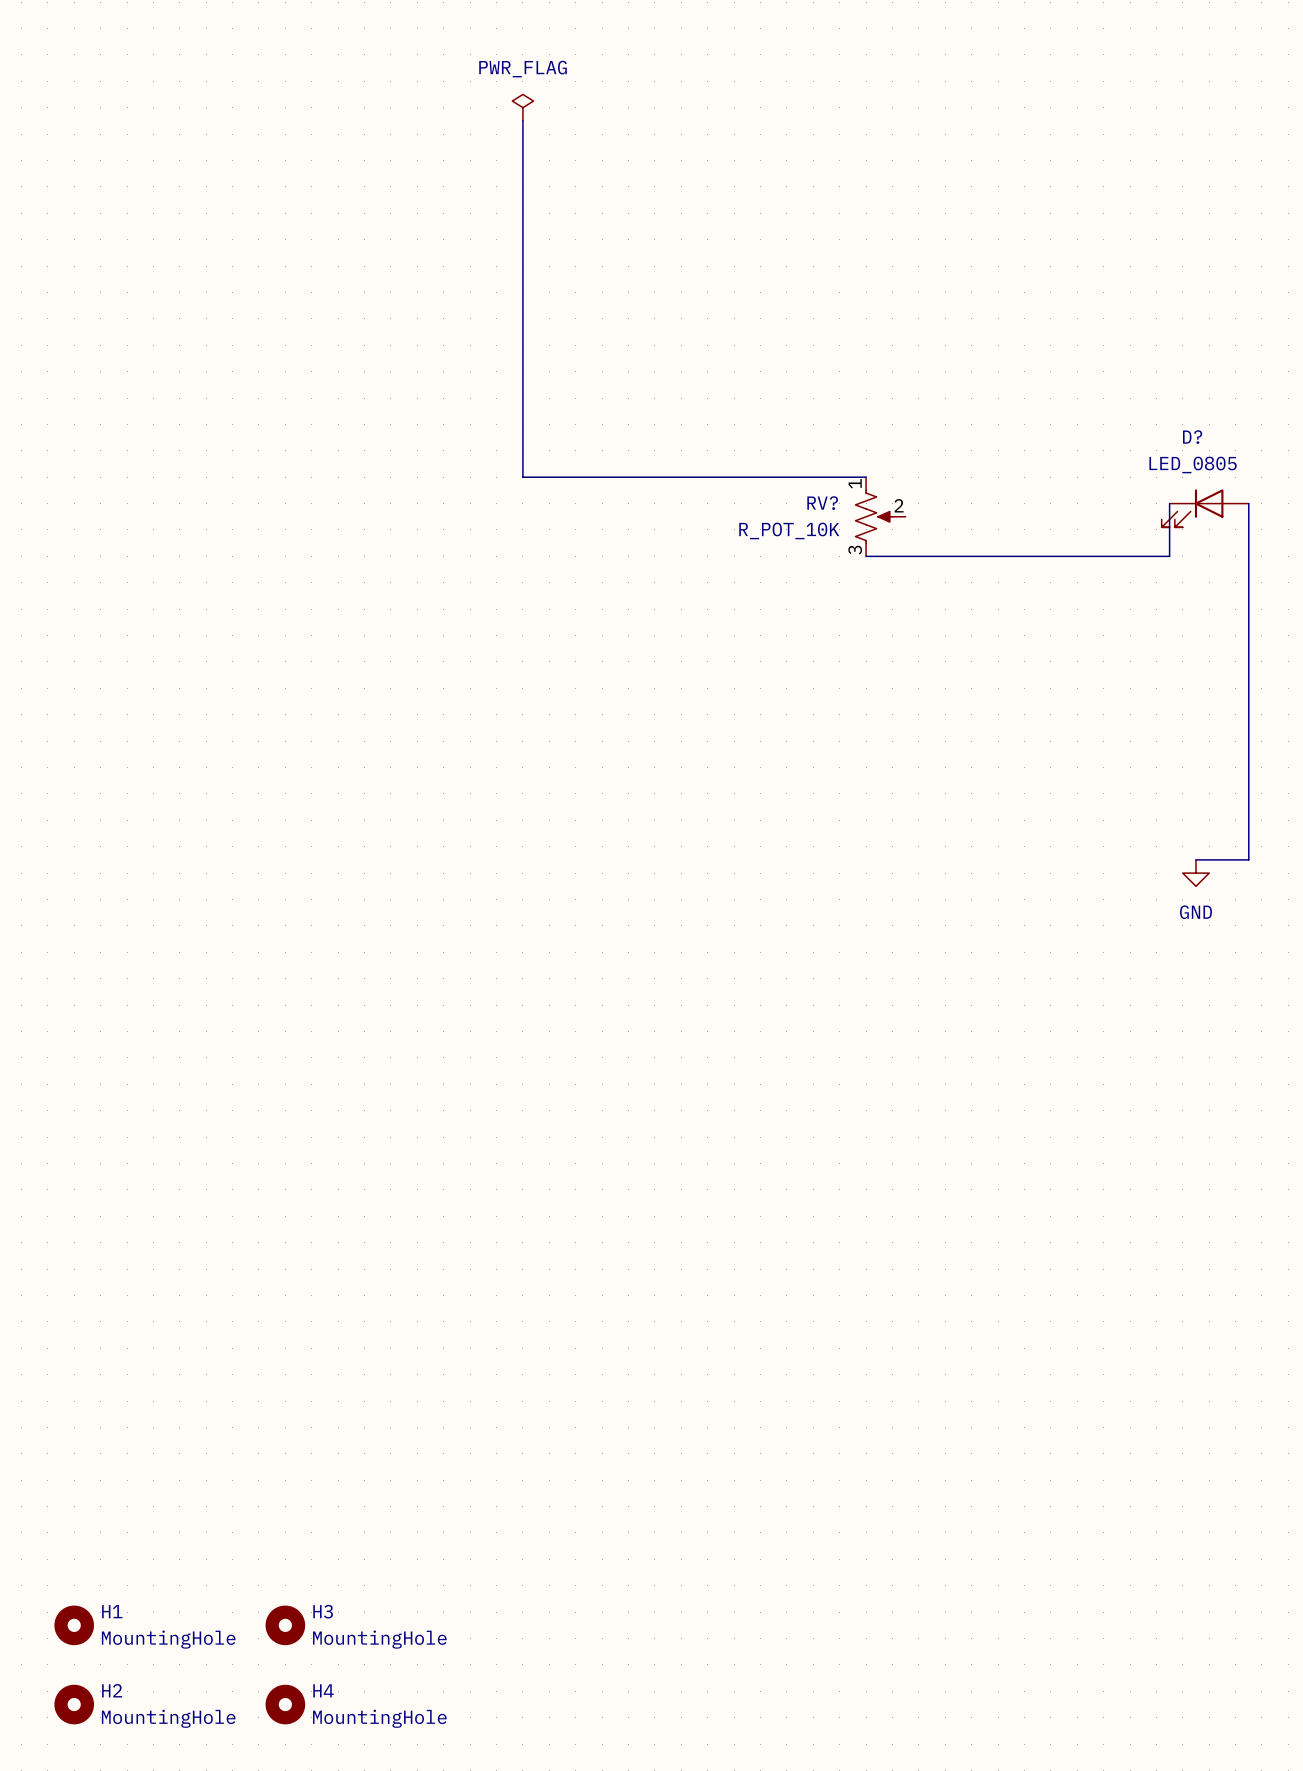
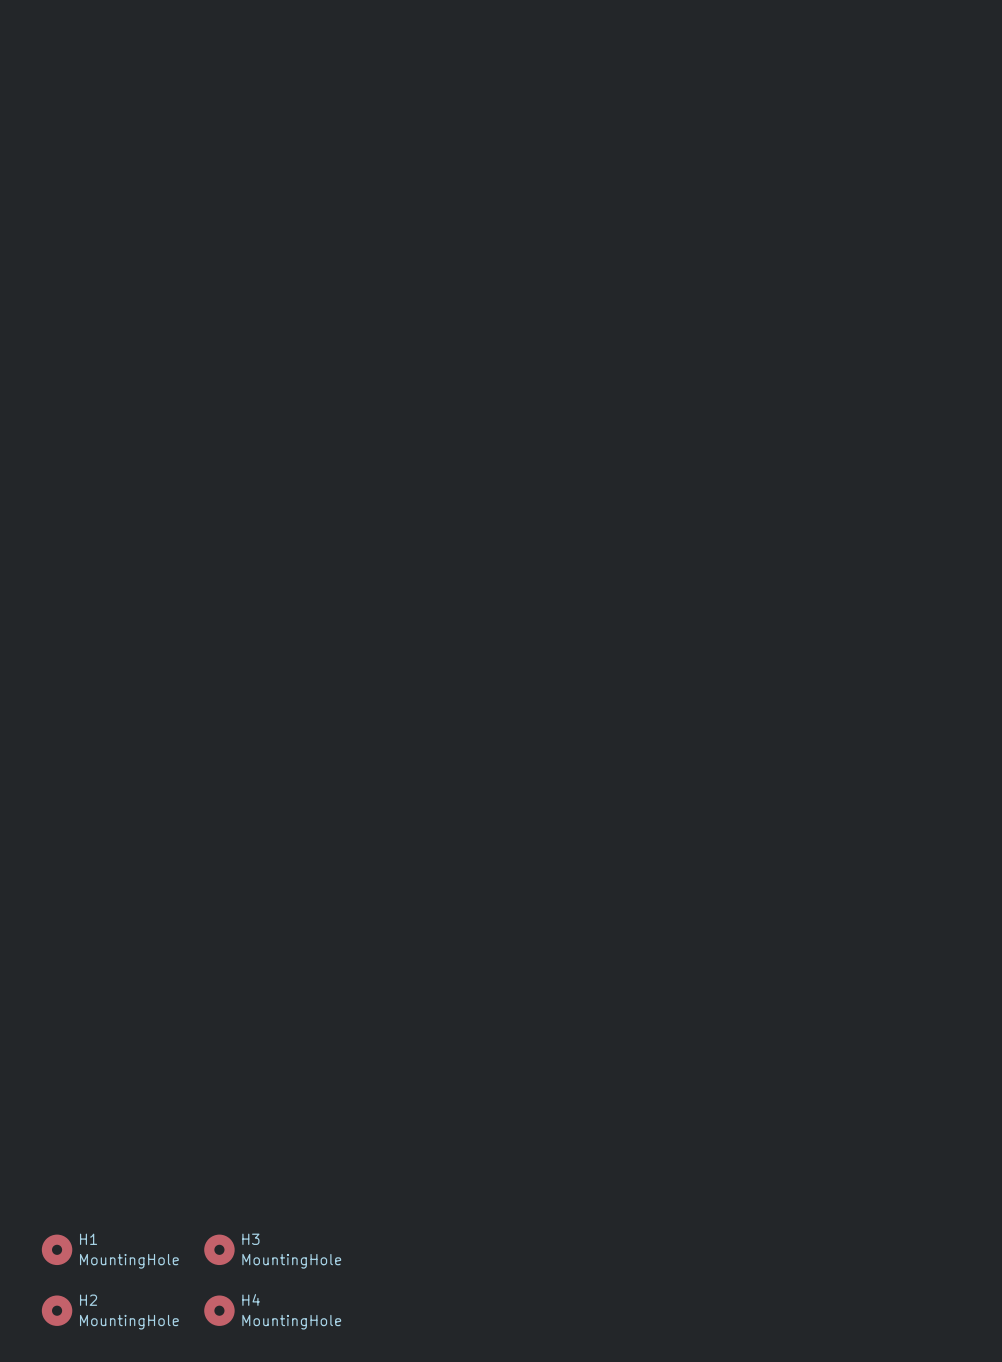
power symbol: PWR_FLAG (522, 107) -> none
wire: (522, 120) (522, 477) (866, 477) -> none
wire: (1169, 503) (1169, 556) (866, 556) -> none
wire: (1248, 503) (1248, 859) (1195, 859) -> none
D?: LED_0805 (1205, 508) -> none
RV?: R_POT_10K (880, 516) -> none
power symbol: GND (1195, 873) -> none

